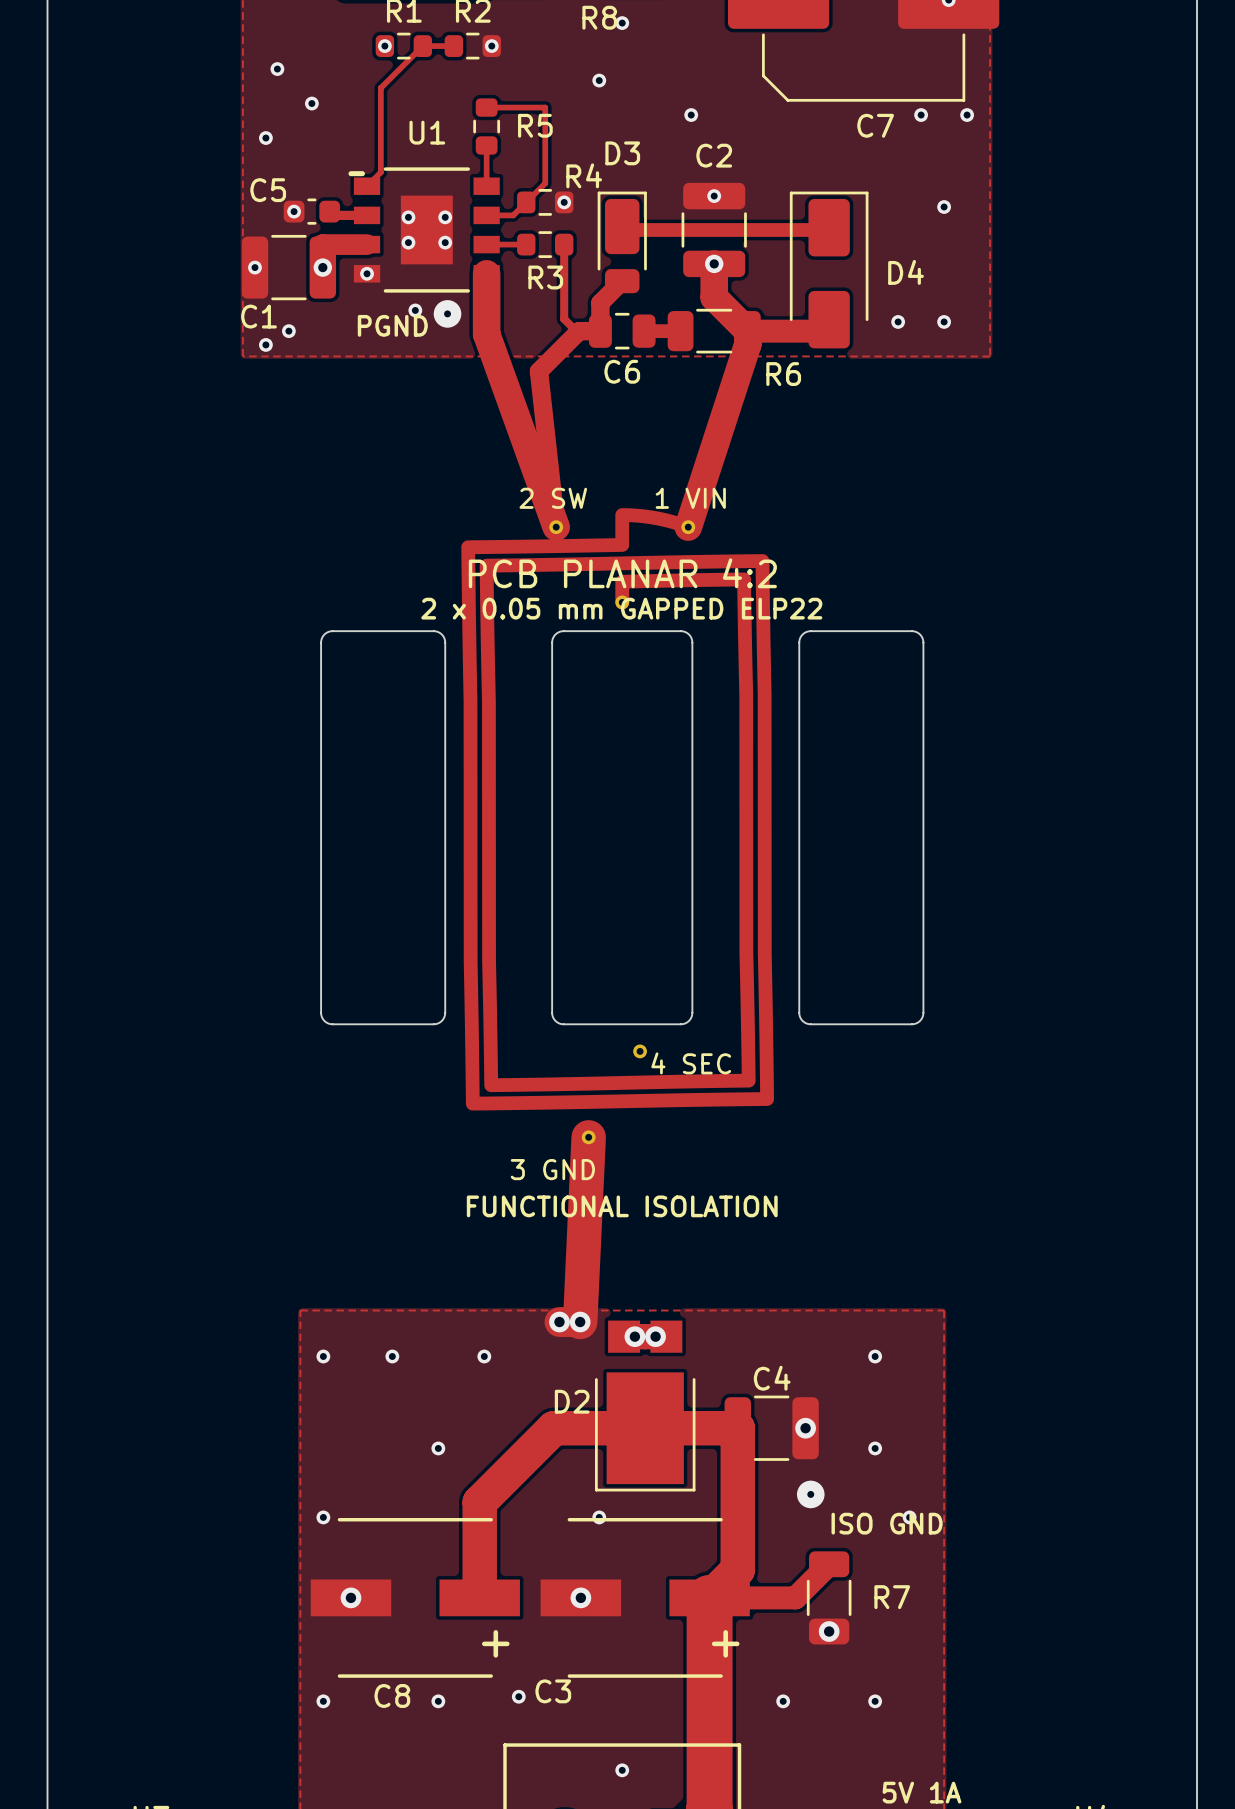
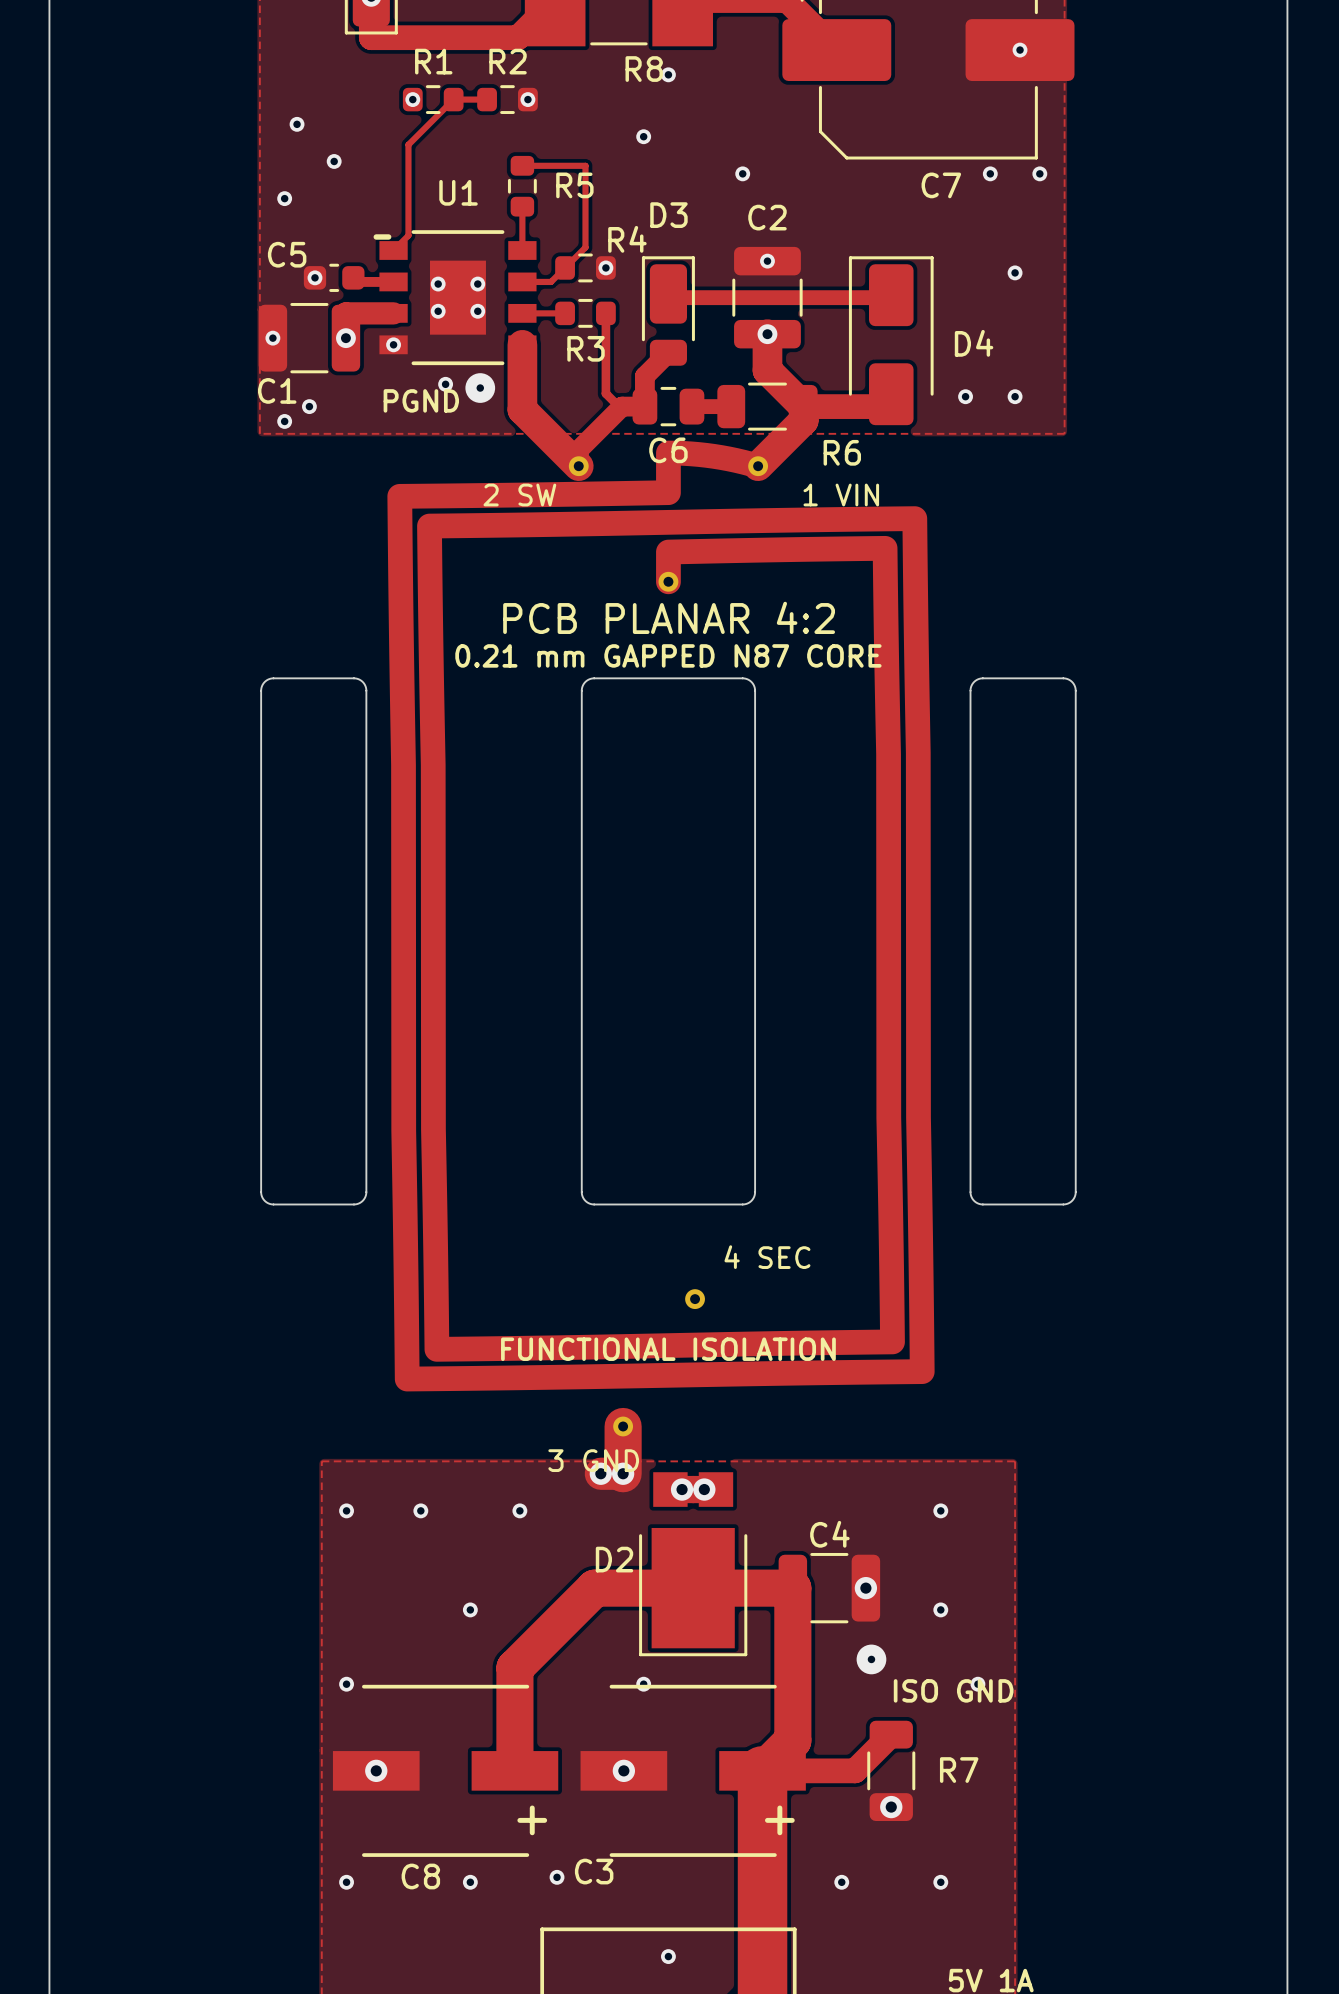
track: (486, 334) (556, 527) (538, 371) -> (522, 409) (578, 466) (578, 449)
track: (747, 344) (688, 527) -> (803, 420) (758, 466)
part footprint: [461, 508, 774, 1145] -> [387, 440, 935, 1437]
text: none -> 0.21 mm GAPPED N87 CORE (668, 655)
text position: PCB PLANAR 4:2 (622, 573) -> PCB PLANAR 4:2 (669, 617)
board edge: none -> (273, 678) (355, 678) (362, 681) (366, 689) (366, 1192) (362, 1200) (355, 1204) (272, 1204) (264, 1200) (261, 1193) (261, 690) (264, 681) (273, 678)
board edge: none -> (982, 678) (1064, 678) (1072, 681) (1075, 689) (1075, 1192) (1072, 1200) (1064, 1204) (981, 1204) (974, 1200) (970, 1193) (970, 690) (974, 681) (982, 678)
text: 2 x 0.05 mm GAPPED ELP22 (621, 608) -> none
board edge: (332, 631) (435, 631) (440, 633) (444, 640) (445, 1012) (442, 1019) (436, 1023) (331, 1024) (325, 1021) (321, 1015) (321, 642) (324, 634) (332, 631) -> none
board edge: (563, 631) (682, 631) (688, 633) (691, 638) (692, 1012) (689, 1019) (683, 1023) (563, 1024) (556, 1021) (552, 1016) (552, 642) (555, 634) (563, 631) -> (594, 678) (585, 681) (581, 690) (582, 1196) (586, 1201) (594, 1204) (745, 1204) (752, 1199) (755, 1192) (754, 686) (750, 681) (742, 678) (594, 678)
board edge: (810, 631) (913, 631) (919, 633) (923, 640) (923, 1012) (921, 1019) (914, 1023) (809, 1024) (802, 1020) (799, 1015) (799, 642) (802, 634) (810, 631) -> none
track: (588, 1137) (580, 1322) -> (623, 1426) (623, 1473)

